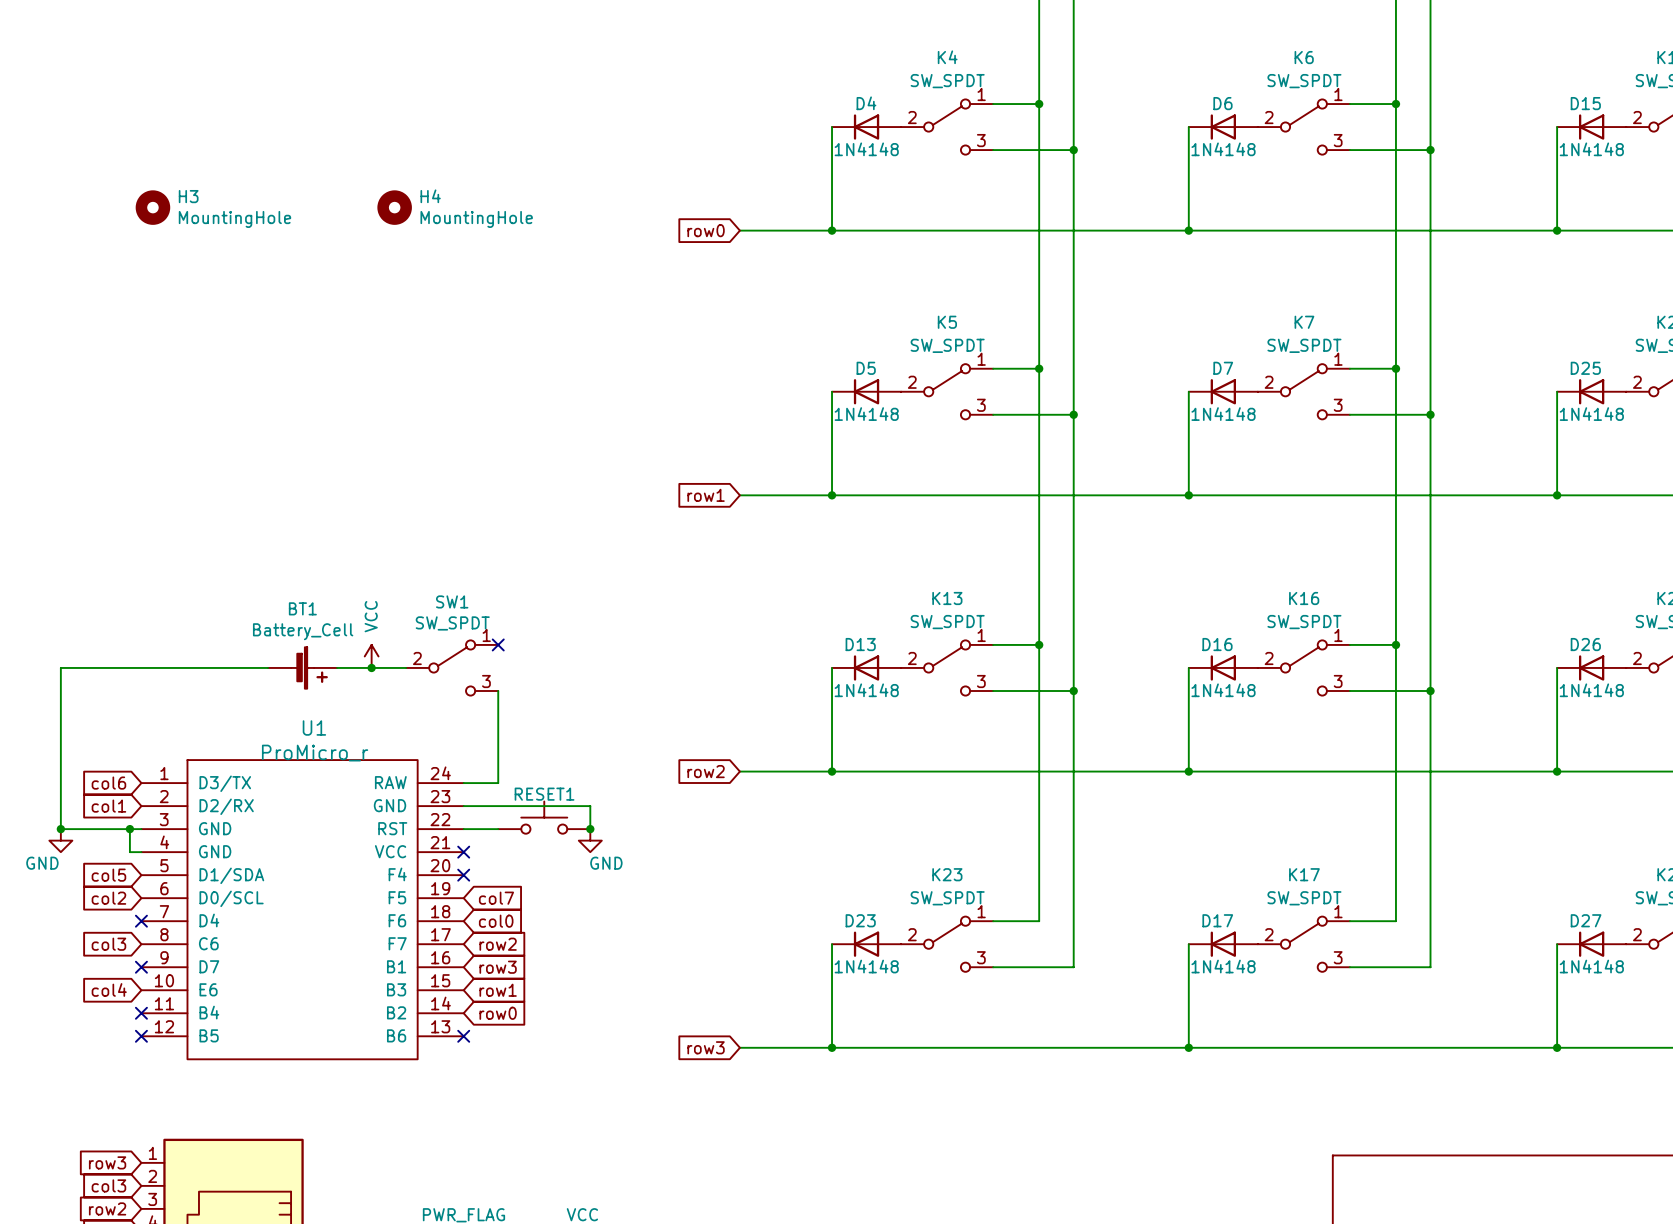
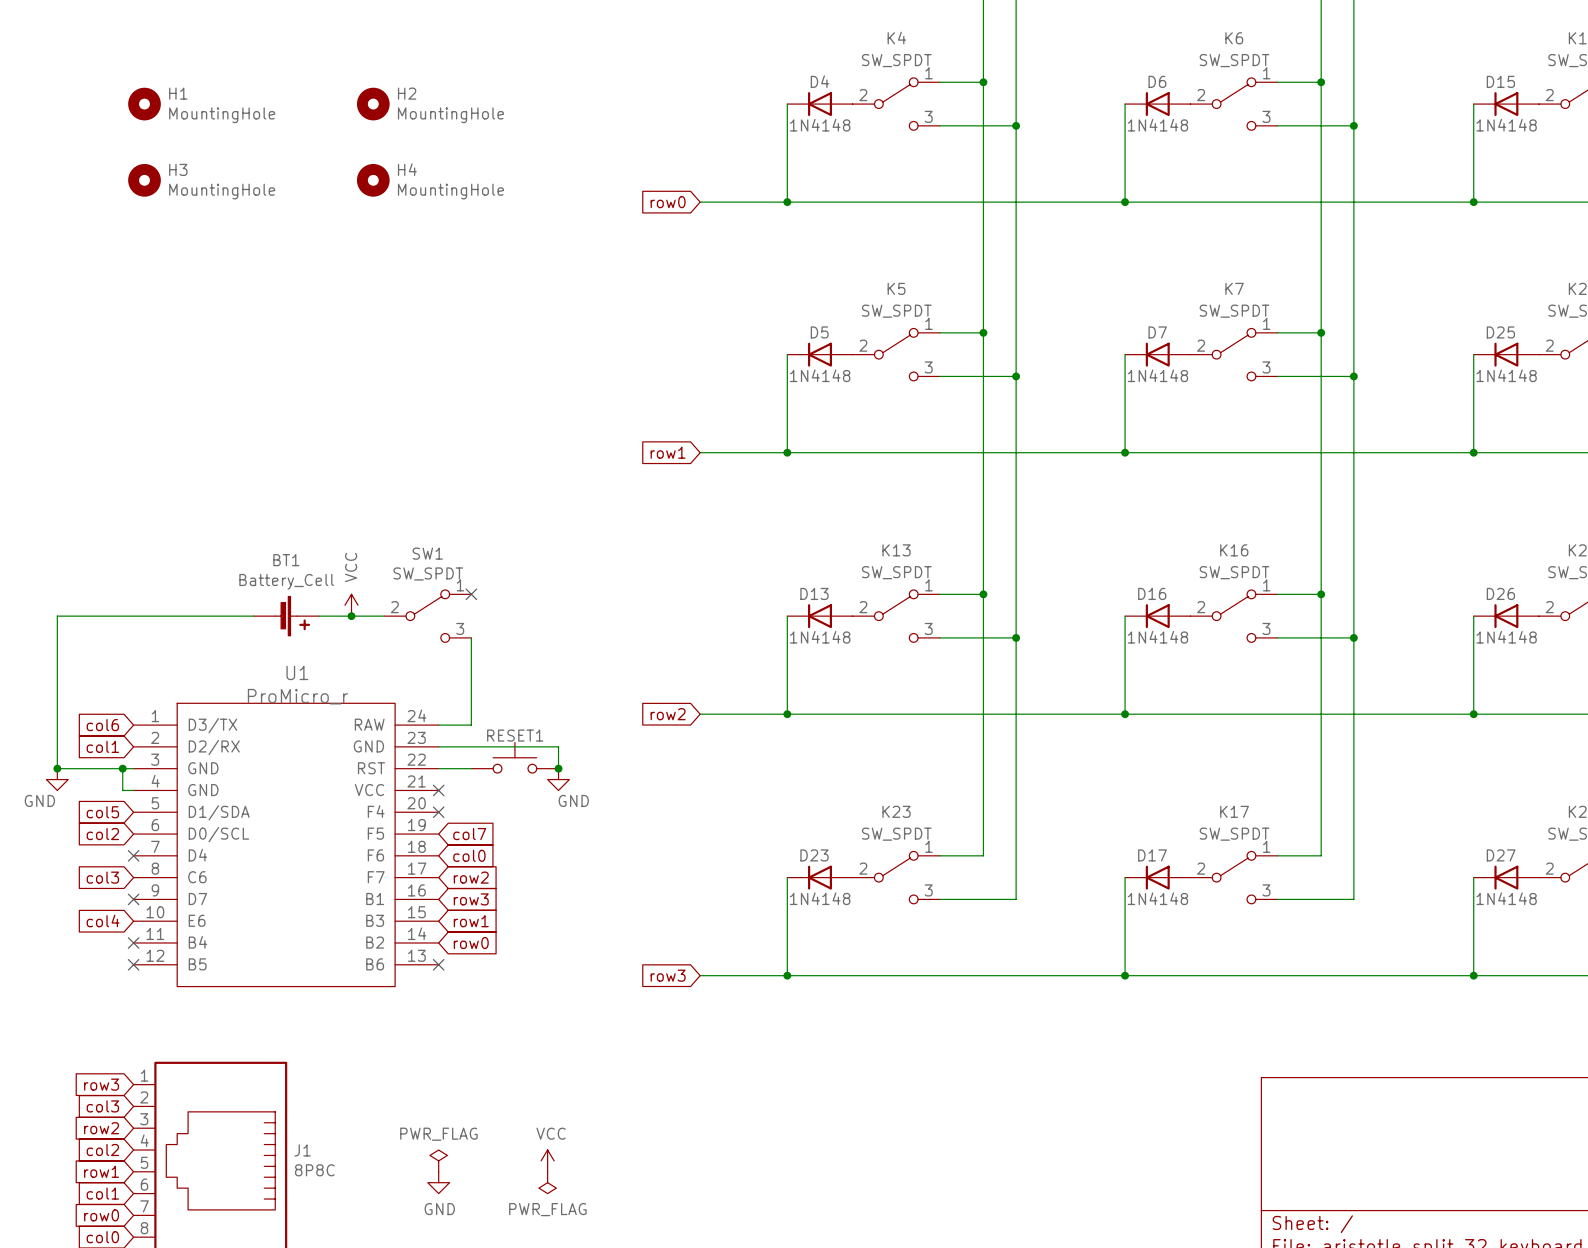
H1: none -> MountingHole (144, 104)
H2: none -> MountingHole (373, 104)

